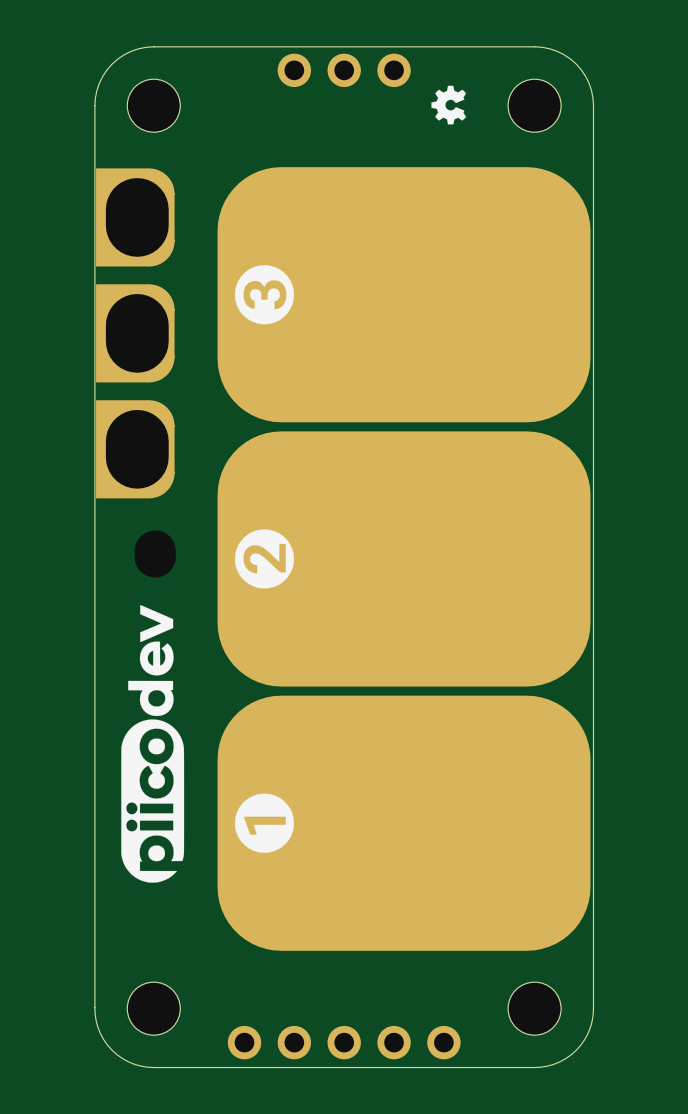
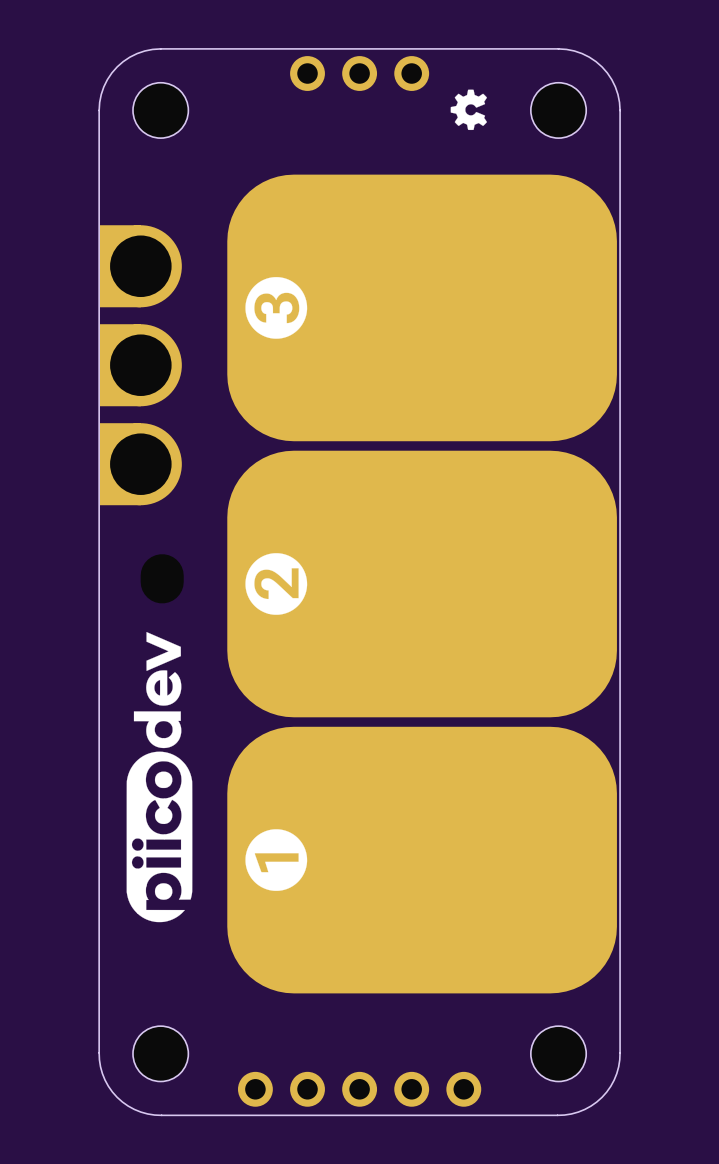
part: (135, 217) -> none
part: none -> (140, 266)
part footprint: [96, 284, 175, 383] -> [99, 324, 182, 407]
part footprint: [96, 400, 175, 499] -> [99, 423, 182, 506]

